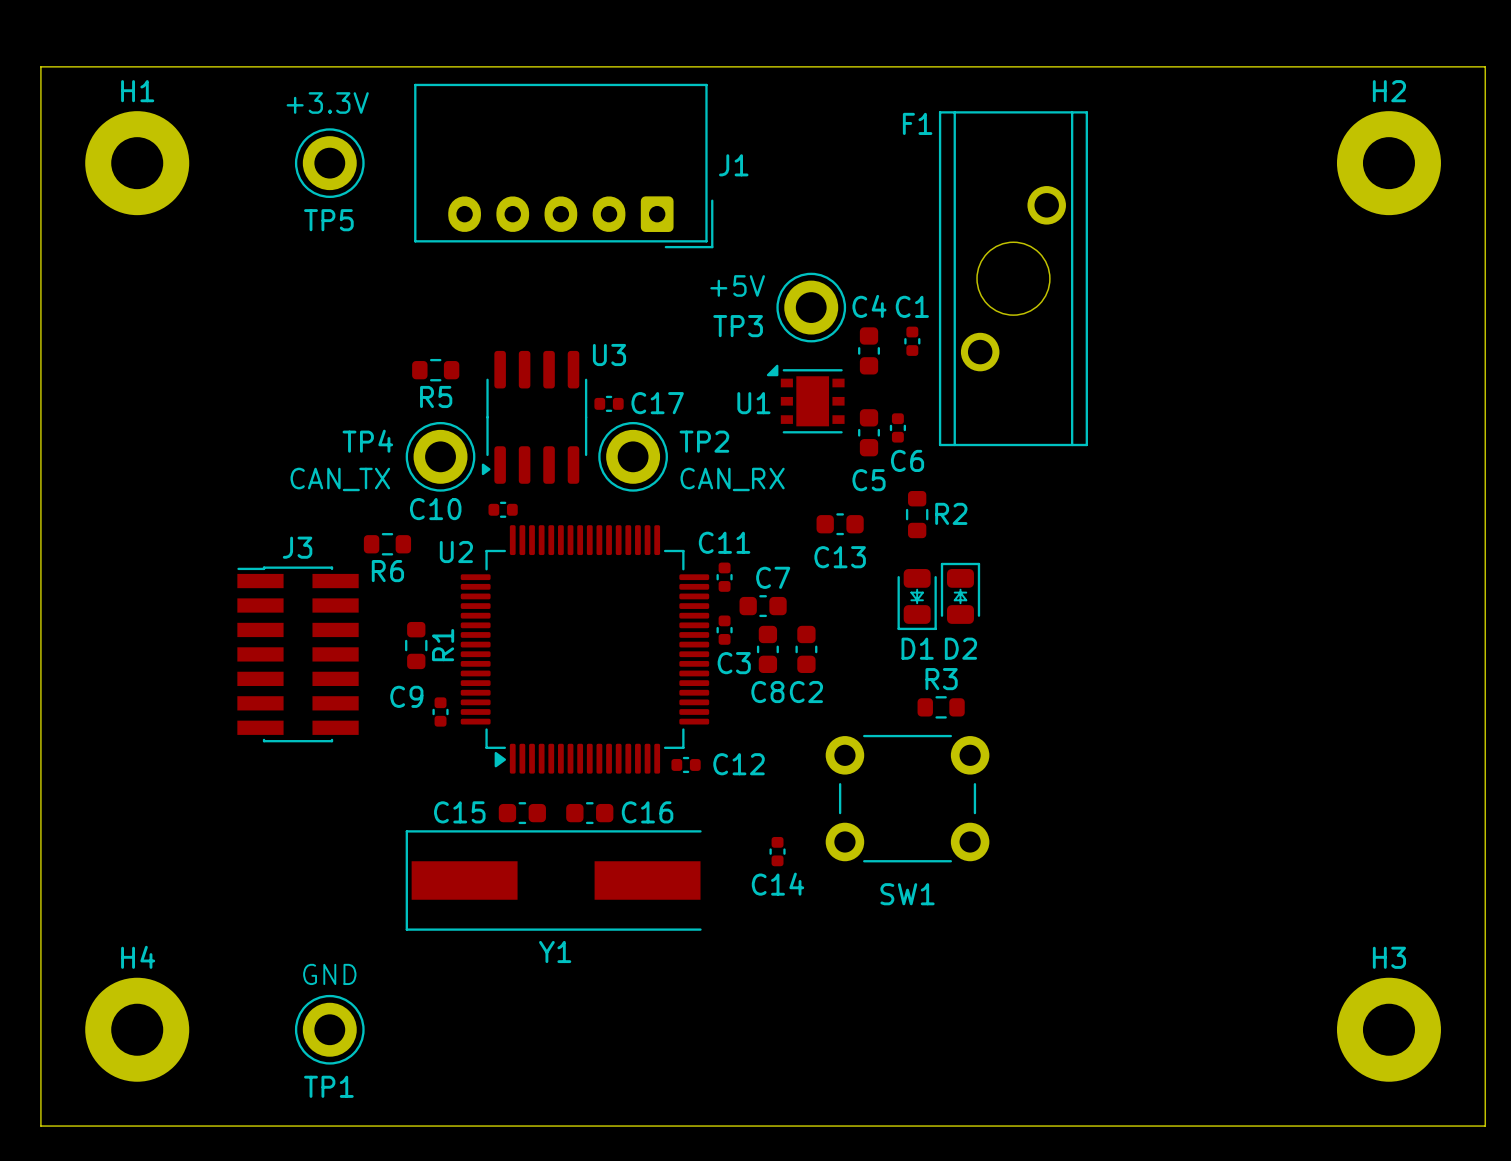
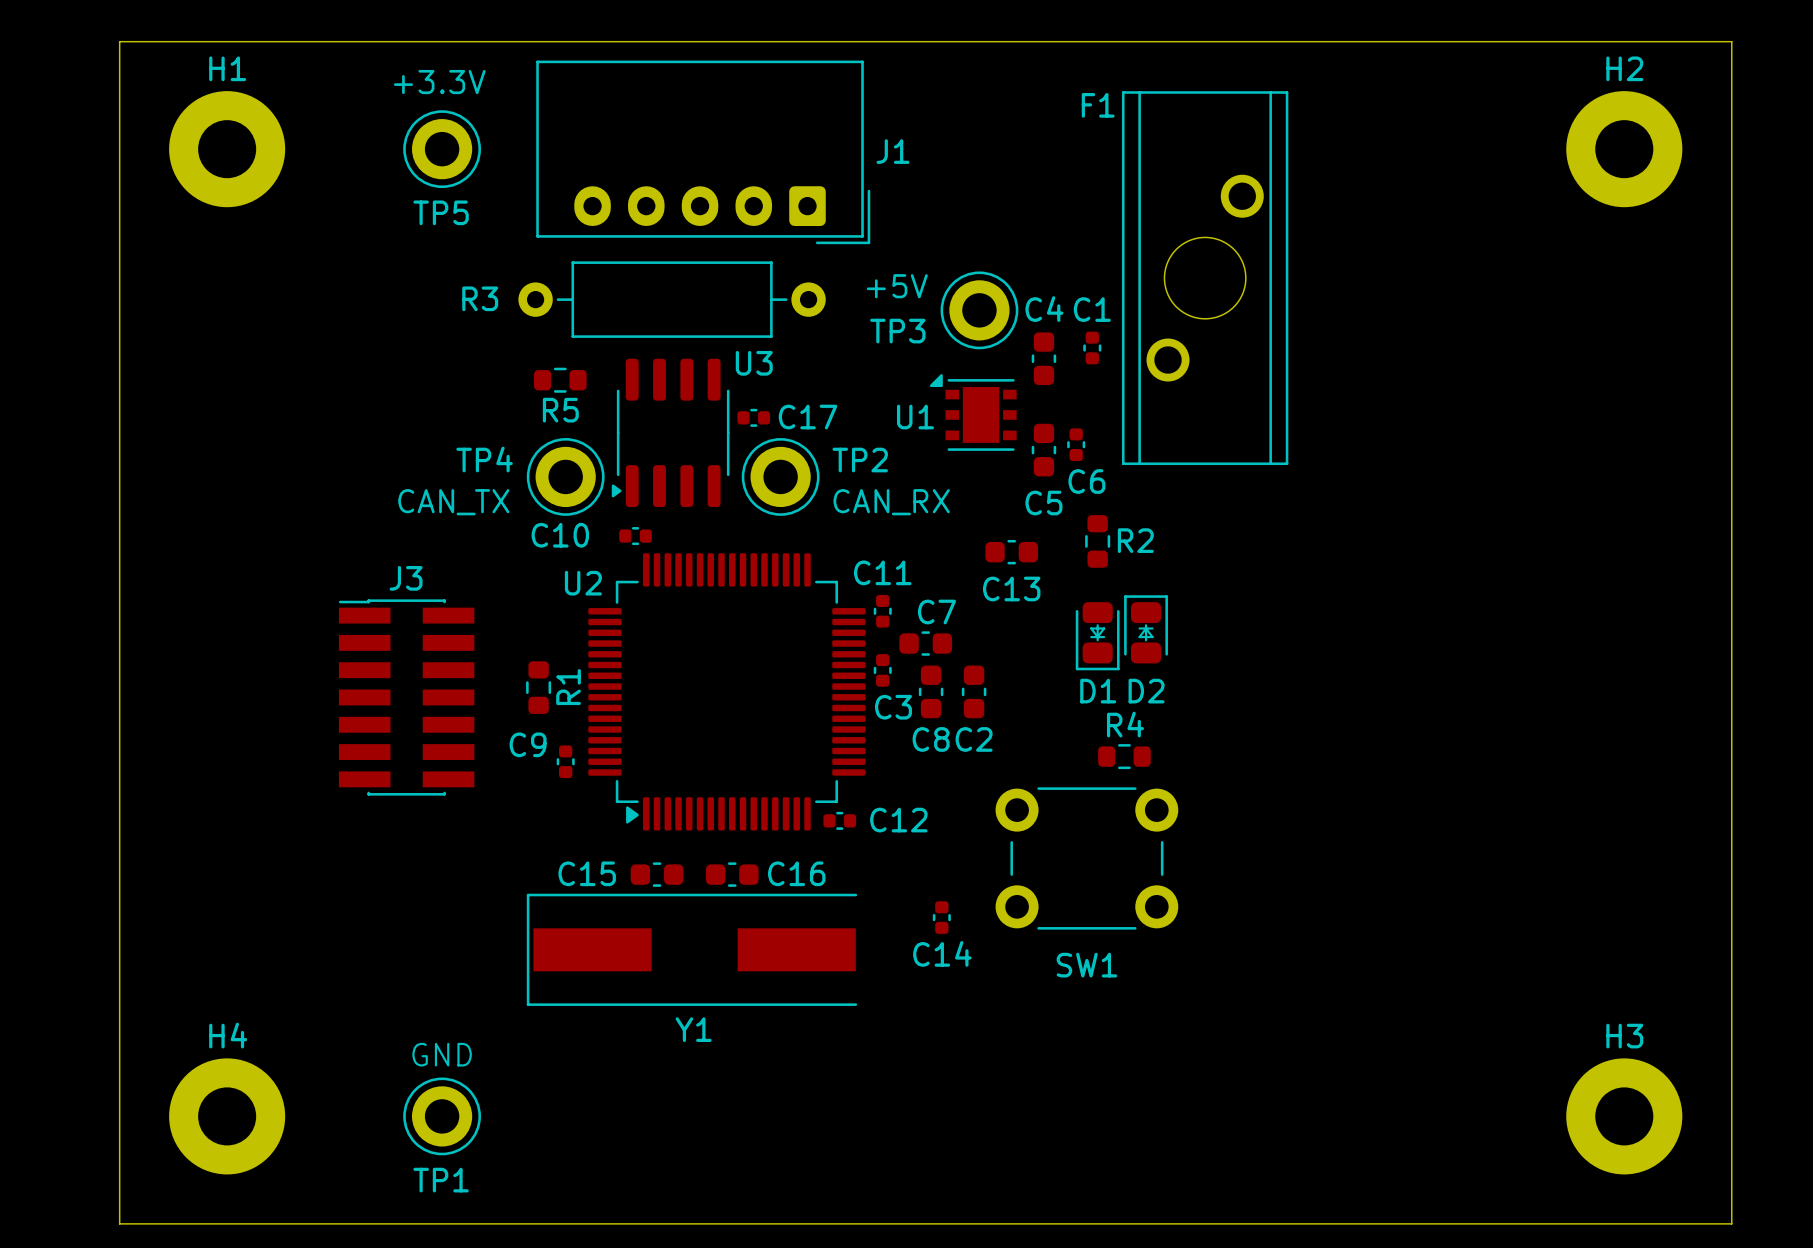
R3: none -> (672, 299)
R6: (387, 544) -> none
R3 name: R3 (941, 679) -> R4 (1125, 724)

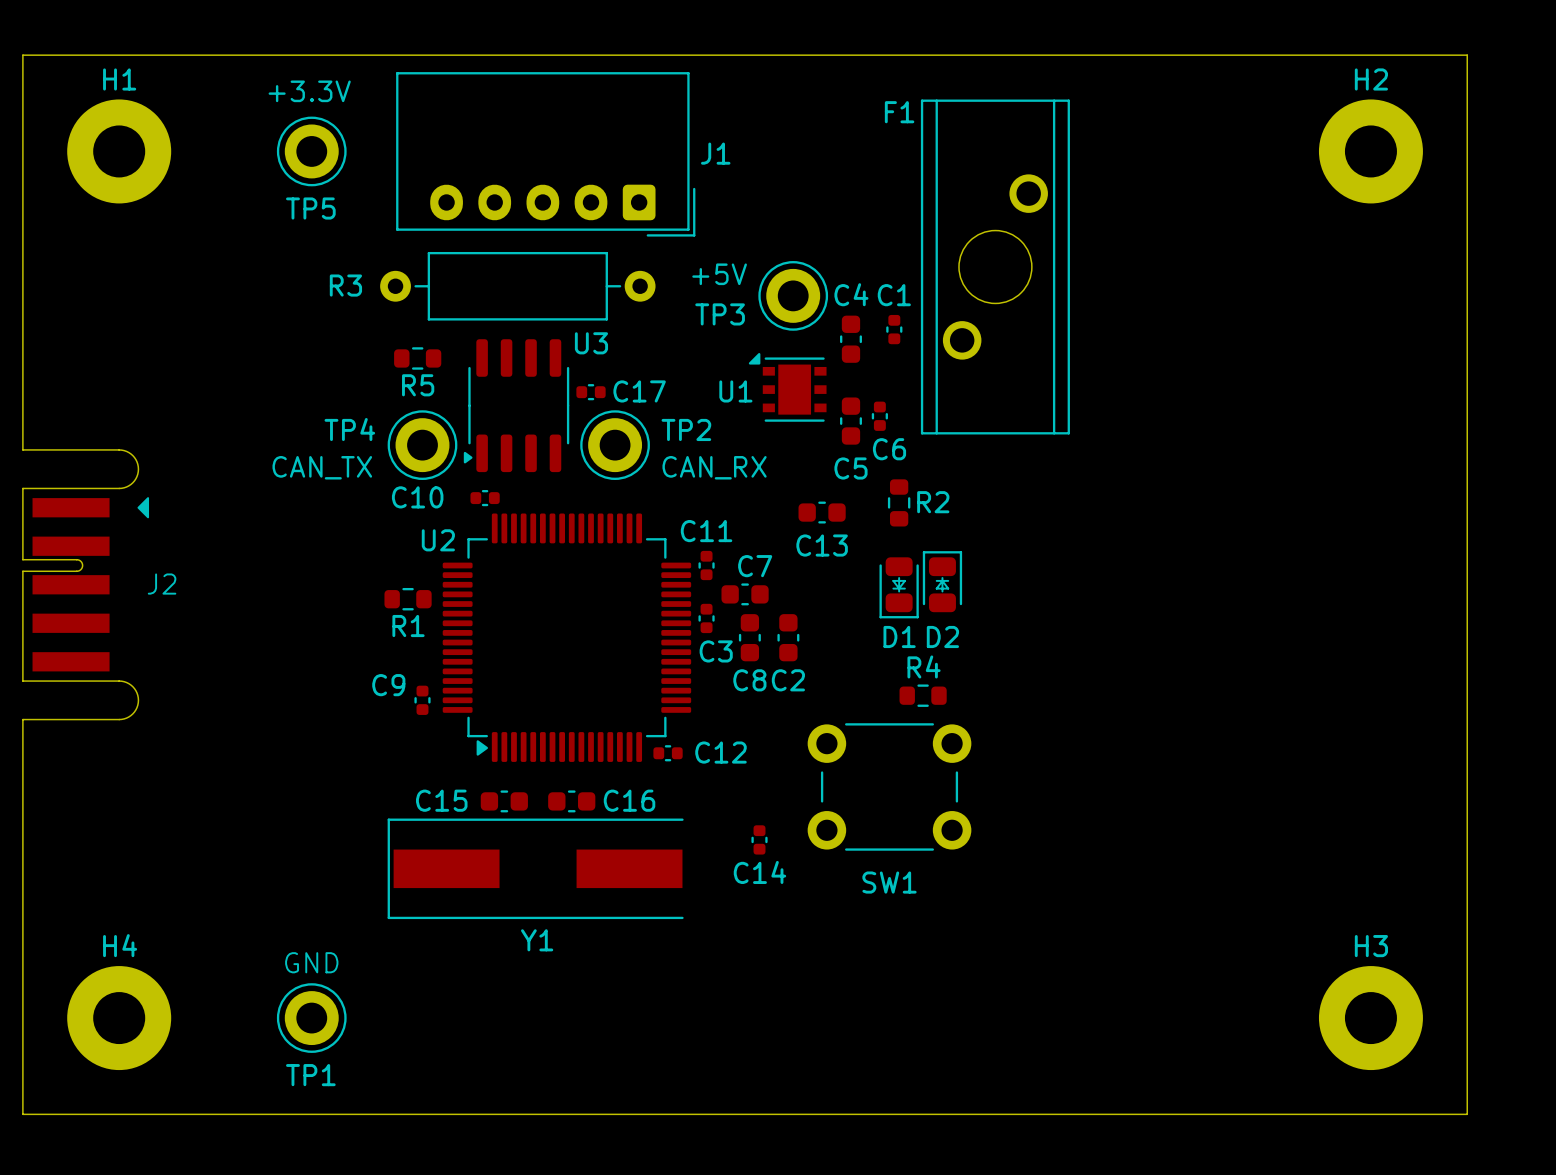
board edge: (119, 482) (119, 783) -> none
J2: none -> (85, 584)
R1 rotation: 0° (538, 687) -> 90° clockwise (408, 599)
R1 position: (538, 687) -> (408, 599)
J3: (406, 697) -> none

